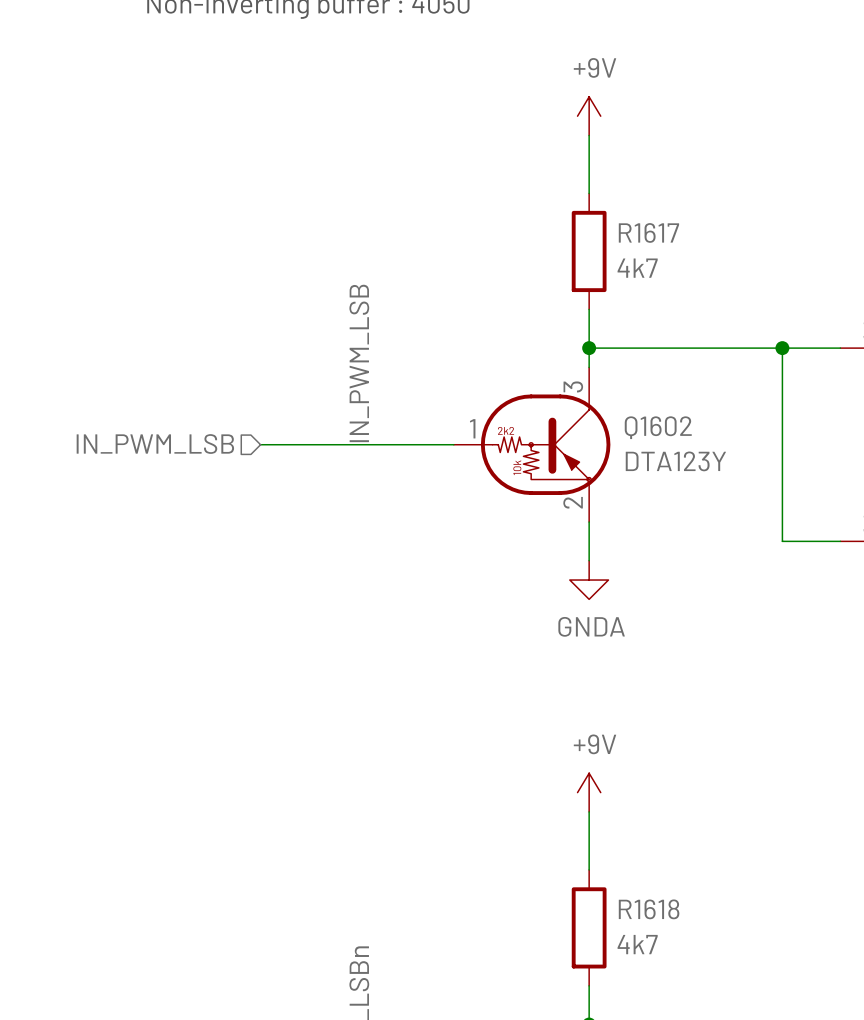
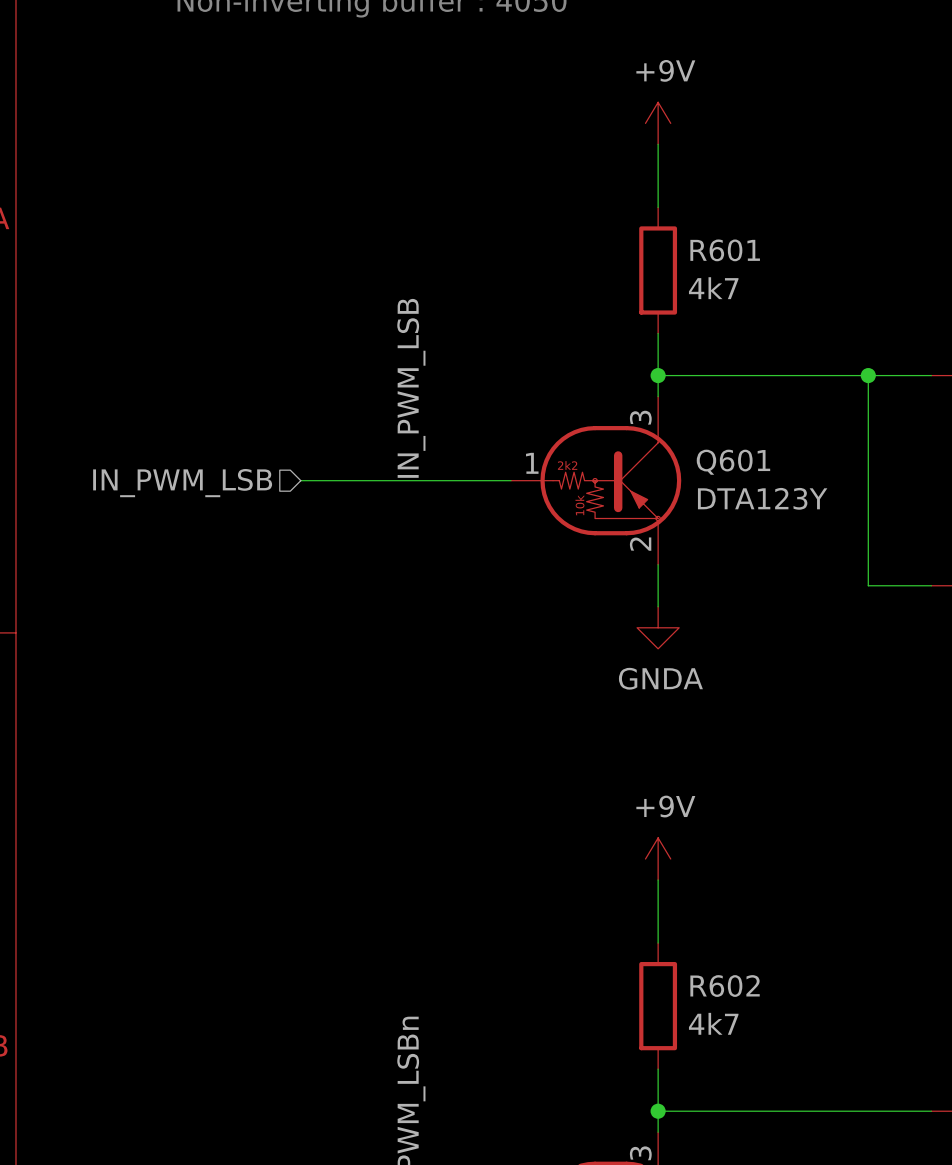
R1617 name: R1617 (648, 232) -> R601 (725, 250)
Q1602 name: Q1602 (658, 427) -> Q601 (733, 462)
R1618 name: R1618 (649, 909) -> R602 (725, 986)

